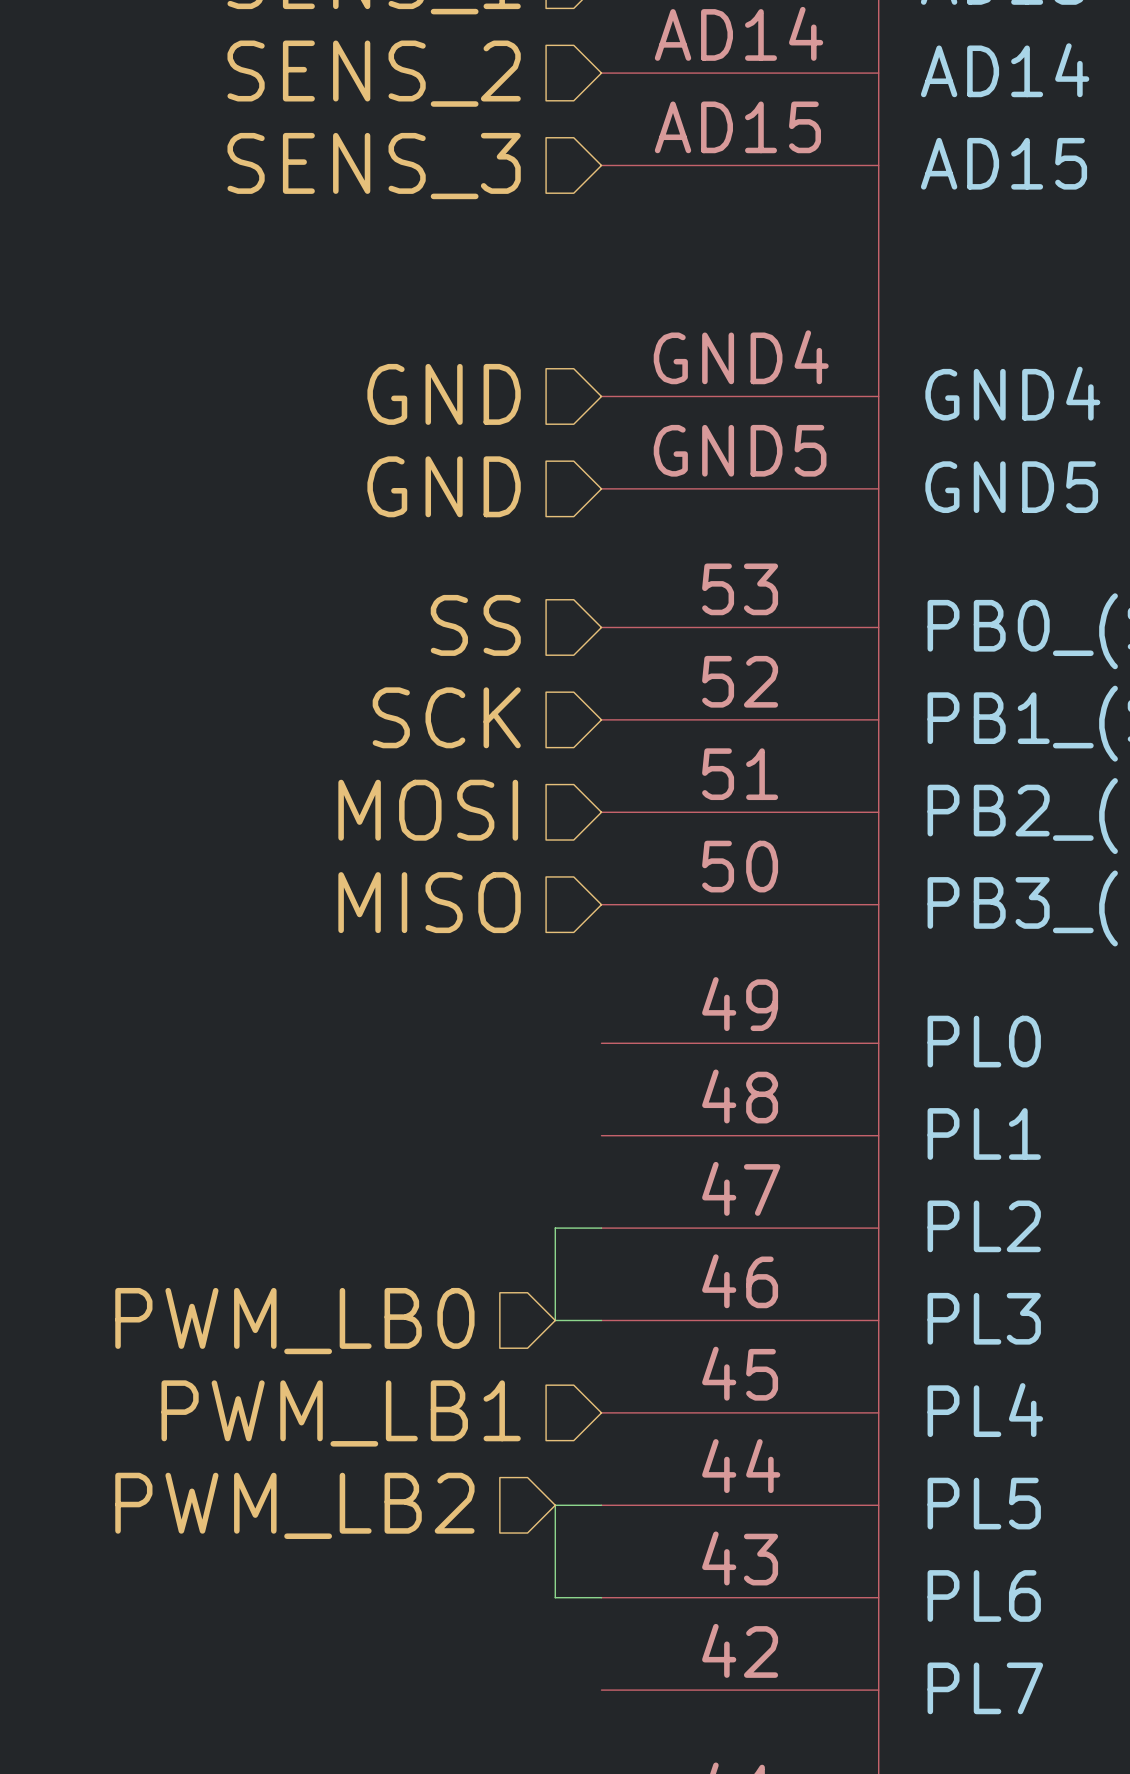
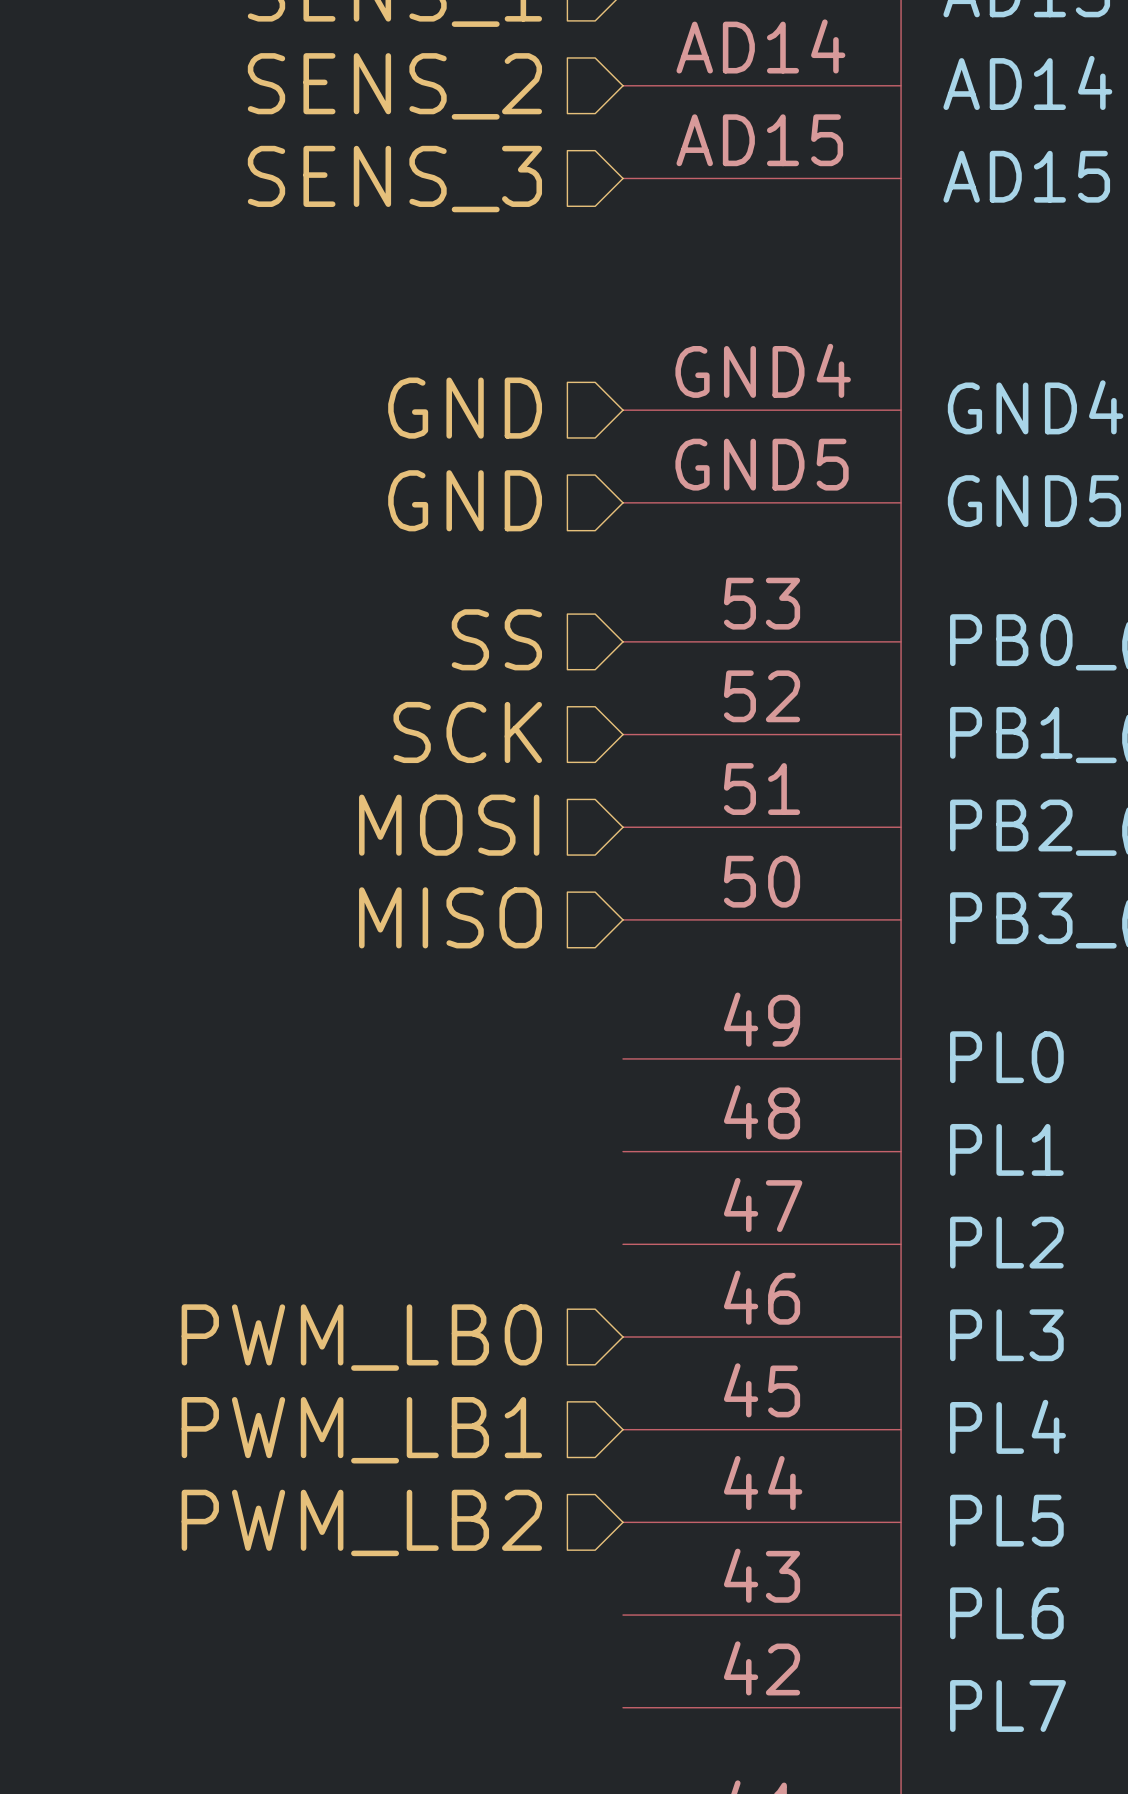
wire: (601, 1228) (555, 1228) (555, 1320) (601, 1320) -> none
hierarchical label position: PWM_LB0 (294, 1321) -> PWM_LB0 (361, 1337)
hierarchical label position: PWM_LB2 (294, 1505) -> PWM_LB2 (361, 1522)
wire: (601, 1505) (555, 1505) (555, 1597) (601, 1597) -> none

